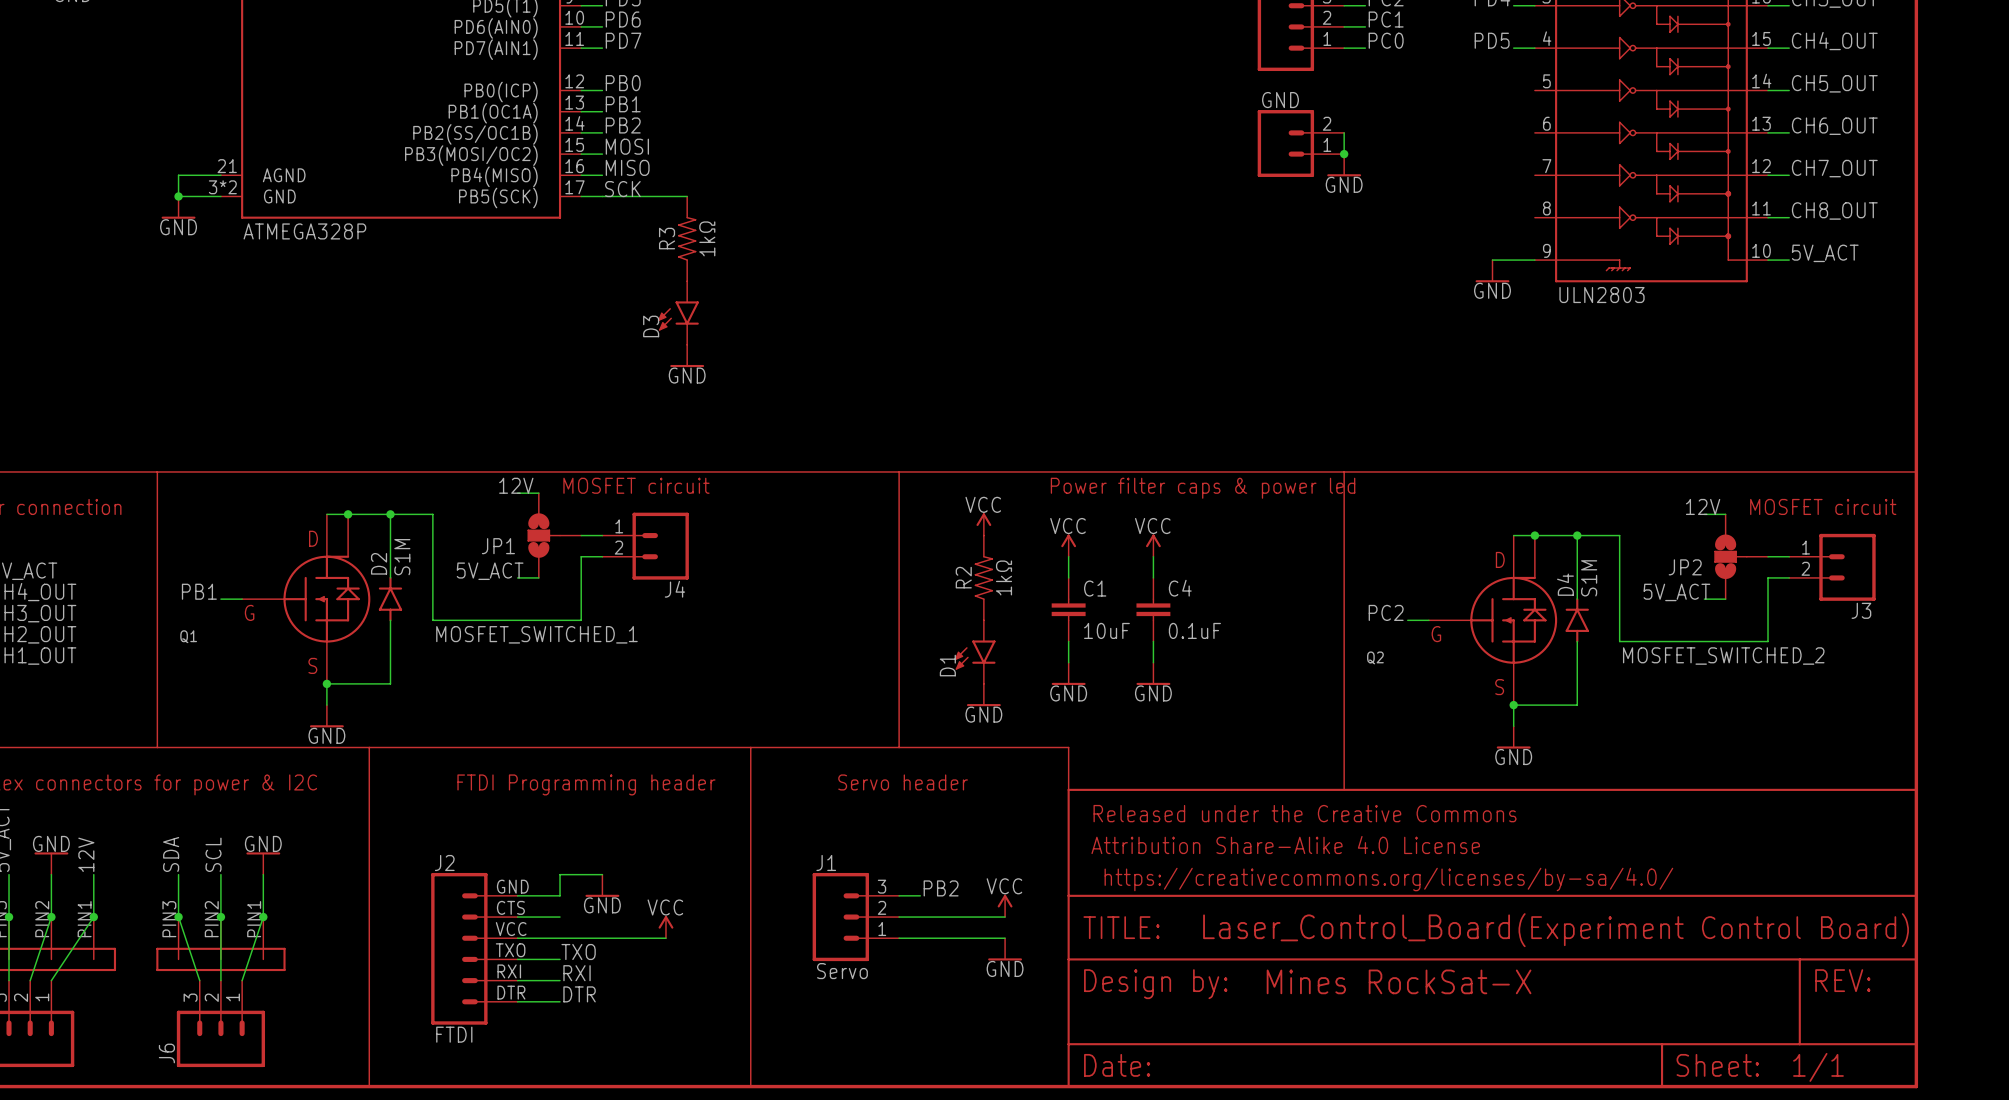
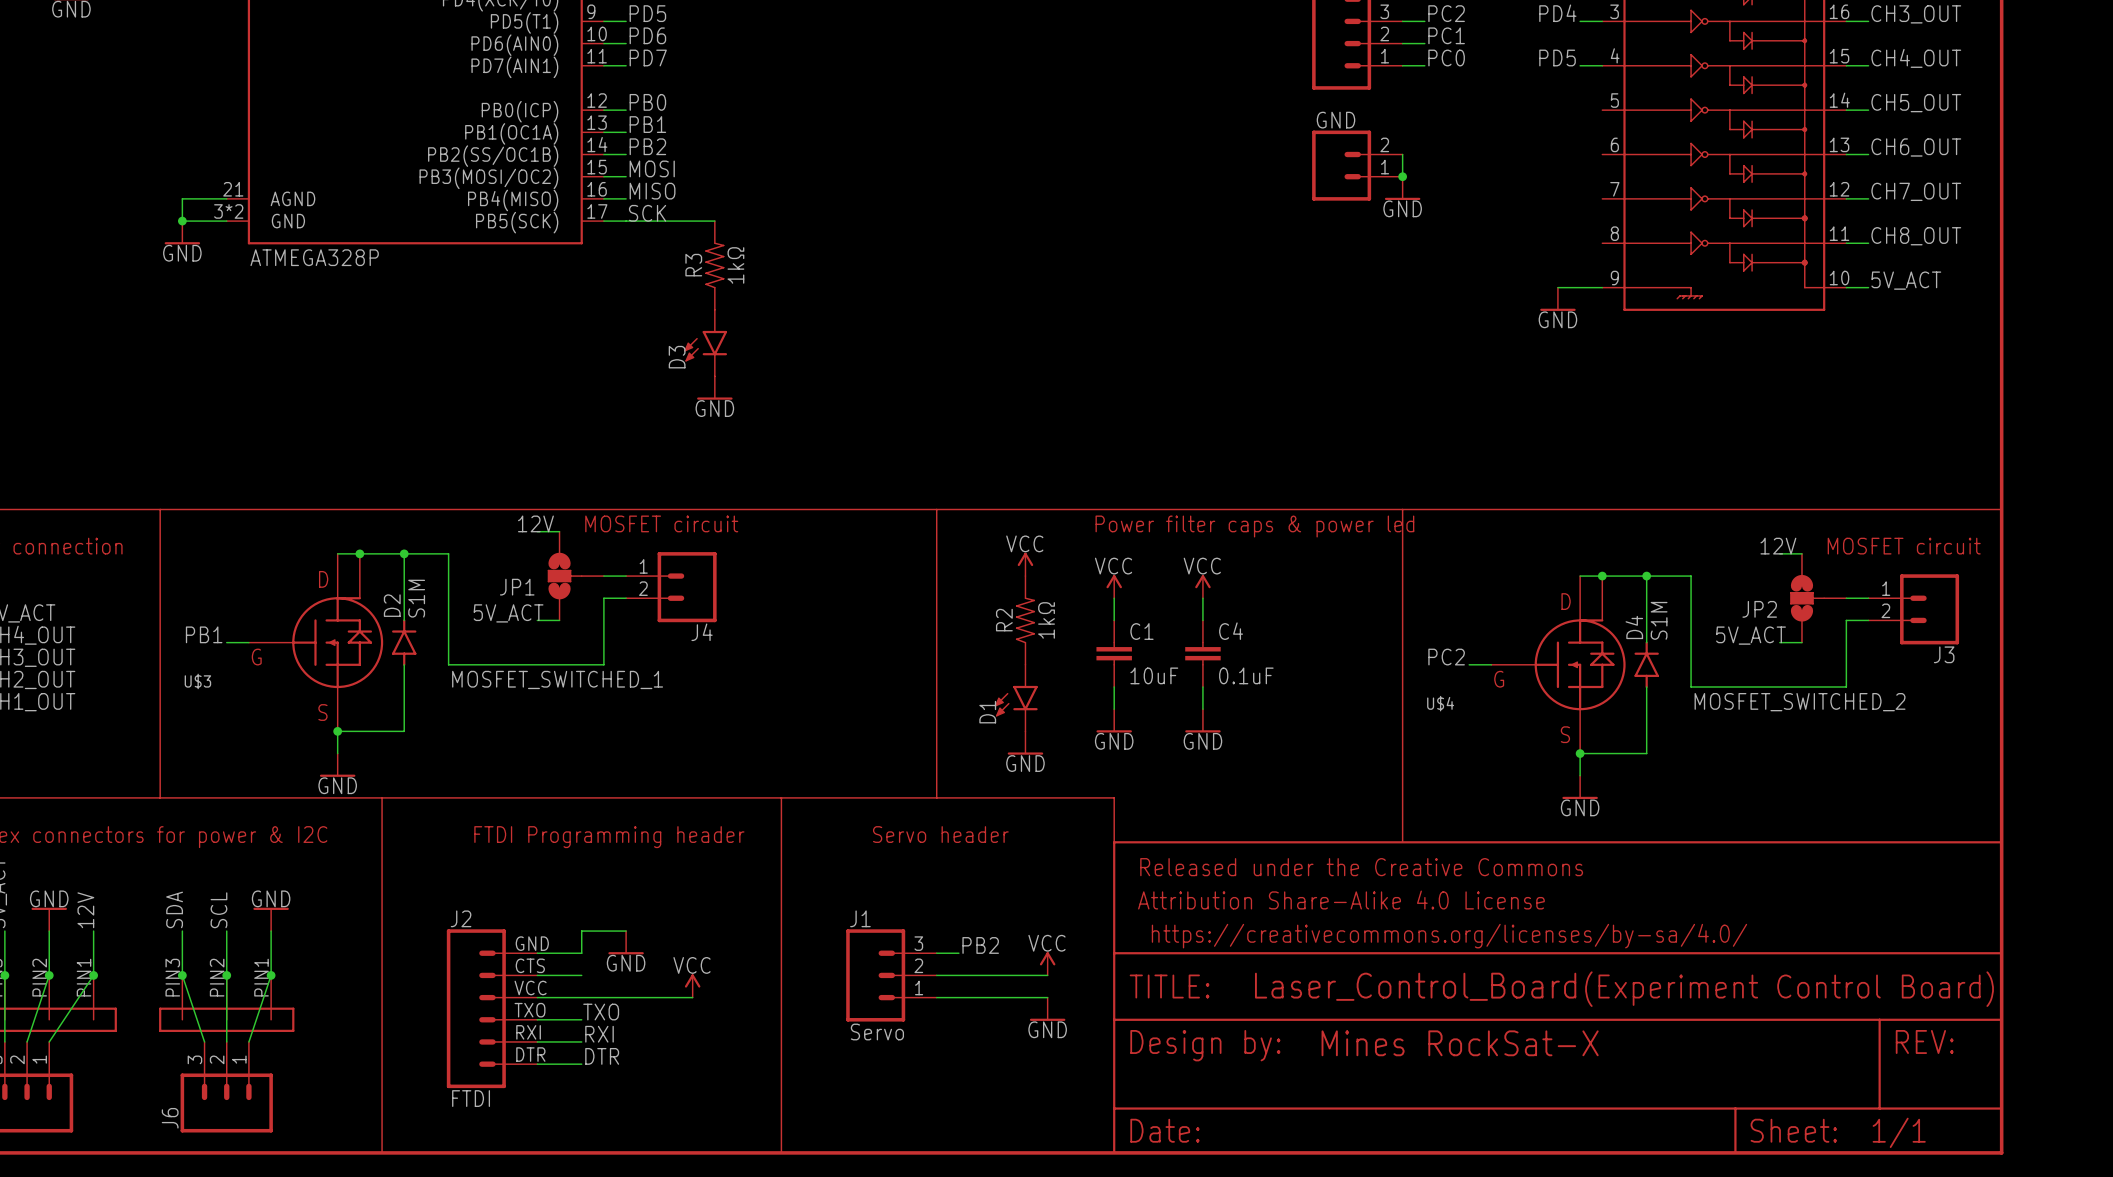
part value: ULN2803 (1602, 295) -> none
Q1 name: Q1 (188, 636) -> U$3 (197, 681)
Q2 name: Q2 (1375, 657) -> U$4 (1440, 703)

